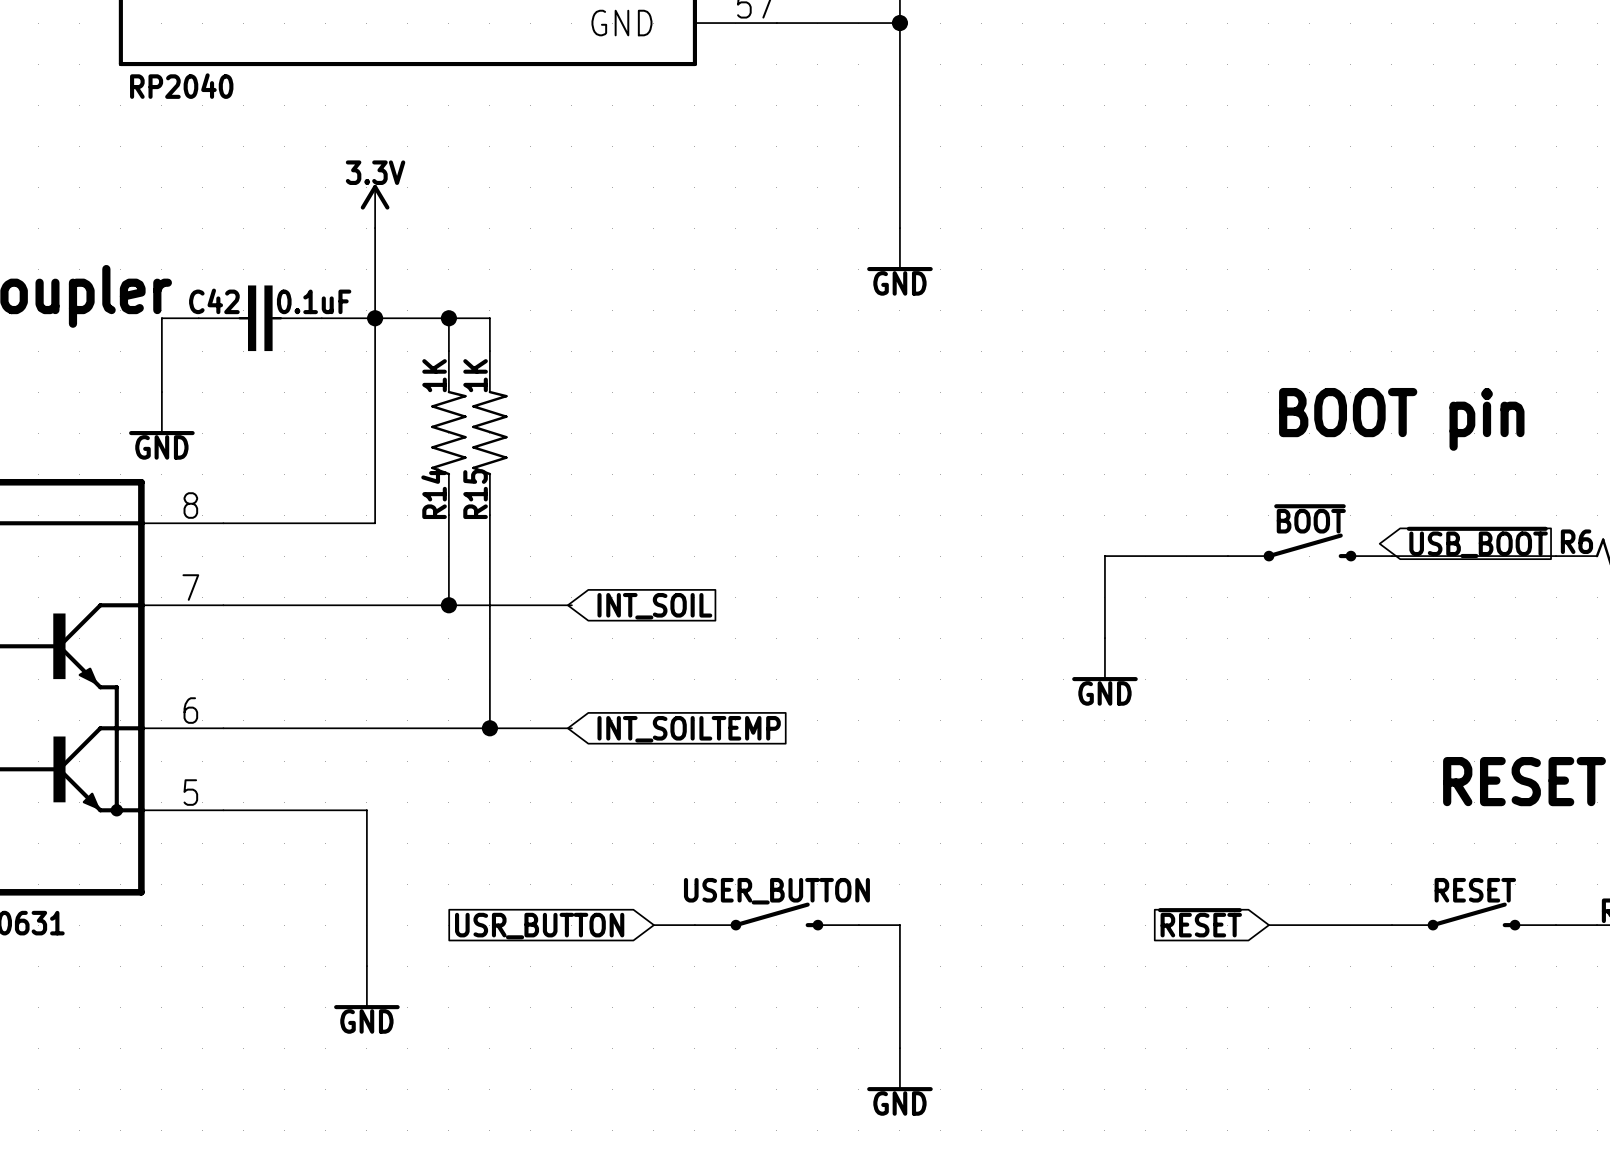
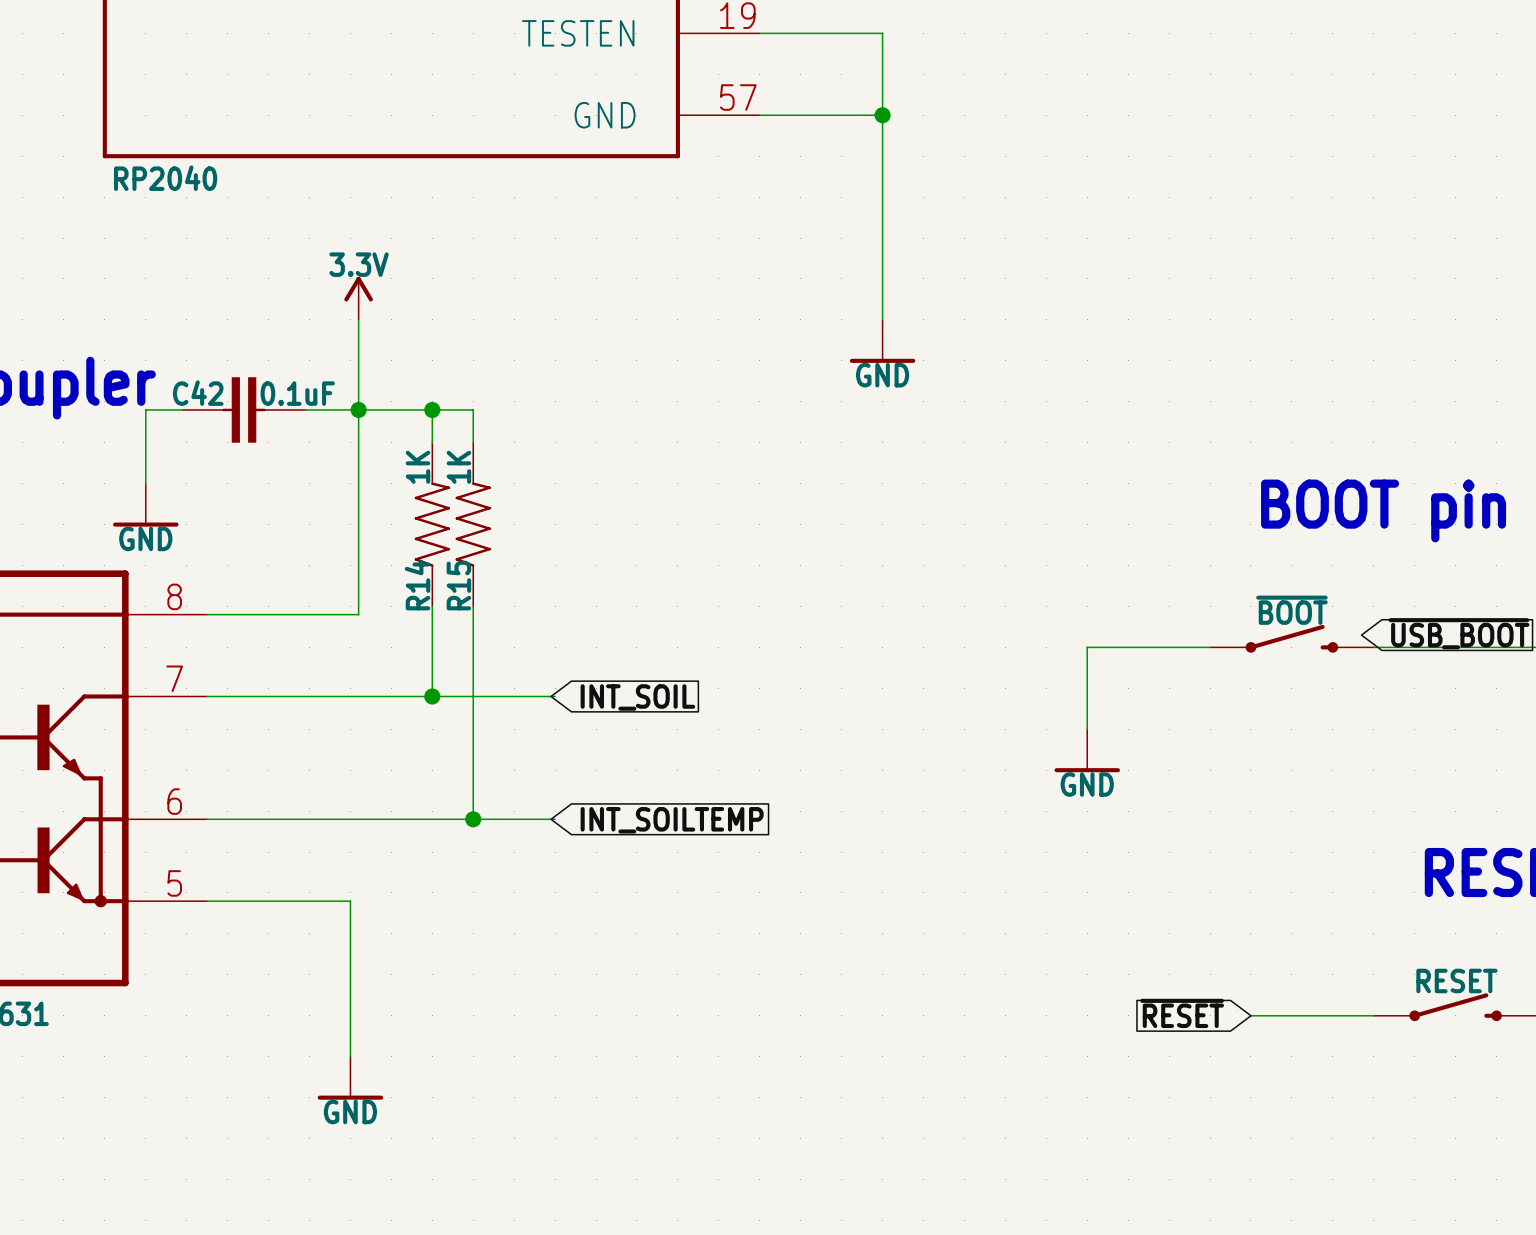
USER_BUTTON: (776, 916) -> none
wire: (653, 925) (694, 925) -> none
wire: (858, 925) (899, 925) (899, 1048) -> none
global label: USR_BUTTON (539, 926) -> none
power symbol: GND (899, 1069) -> none

